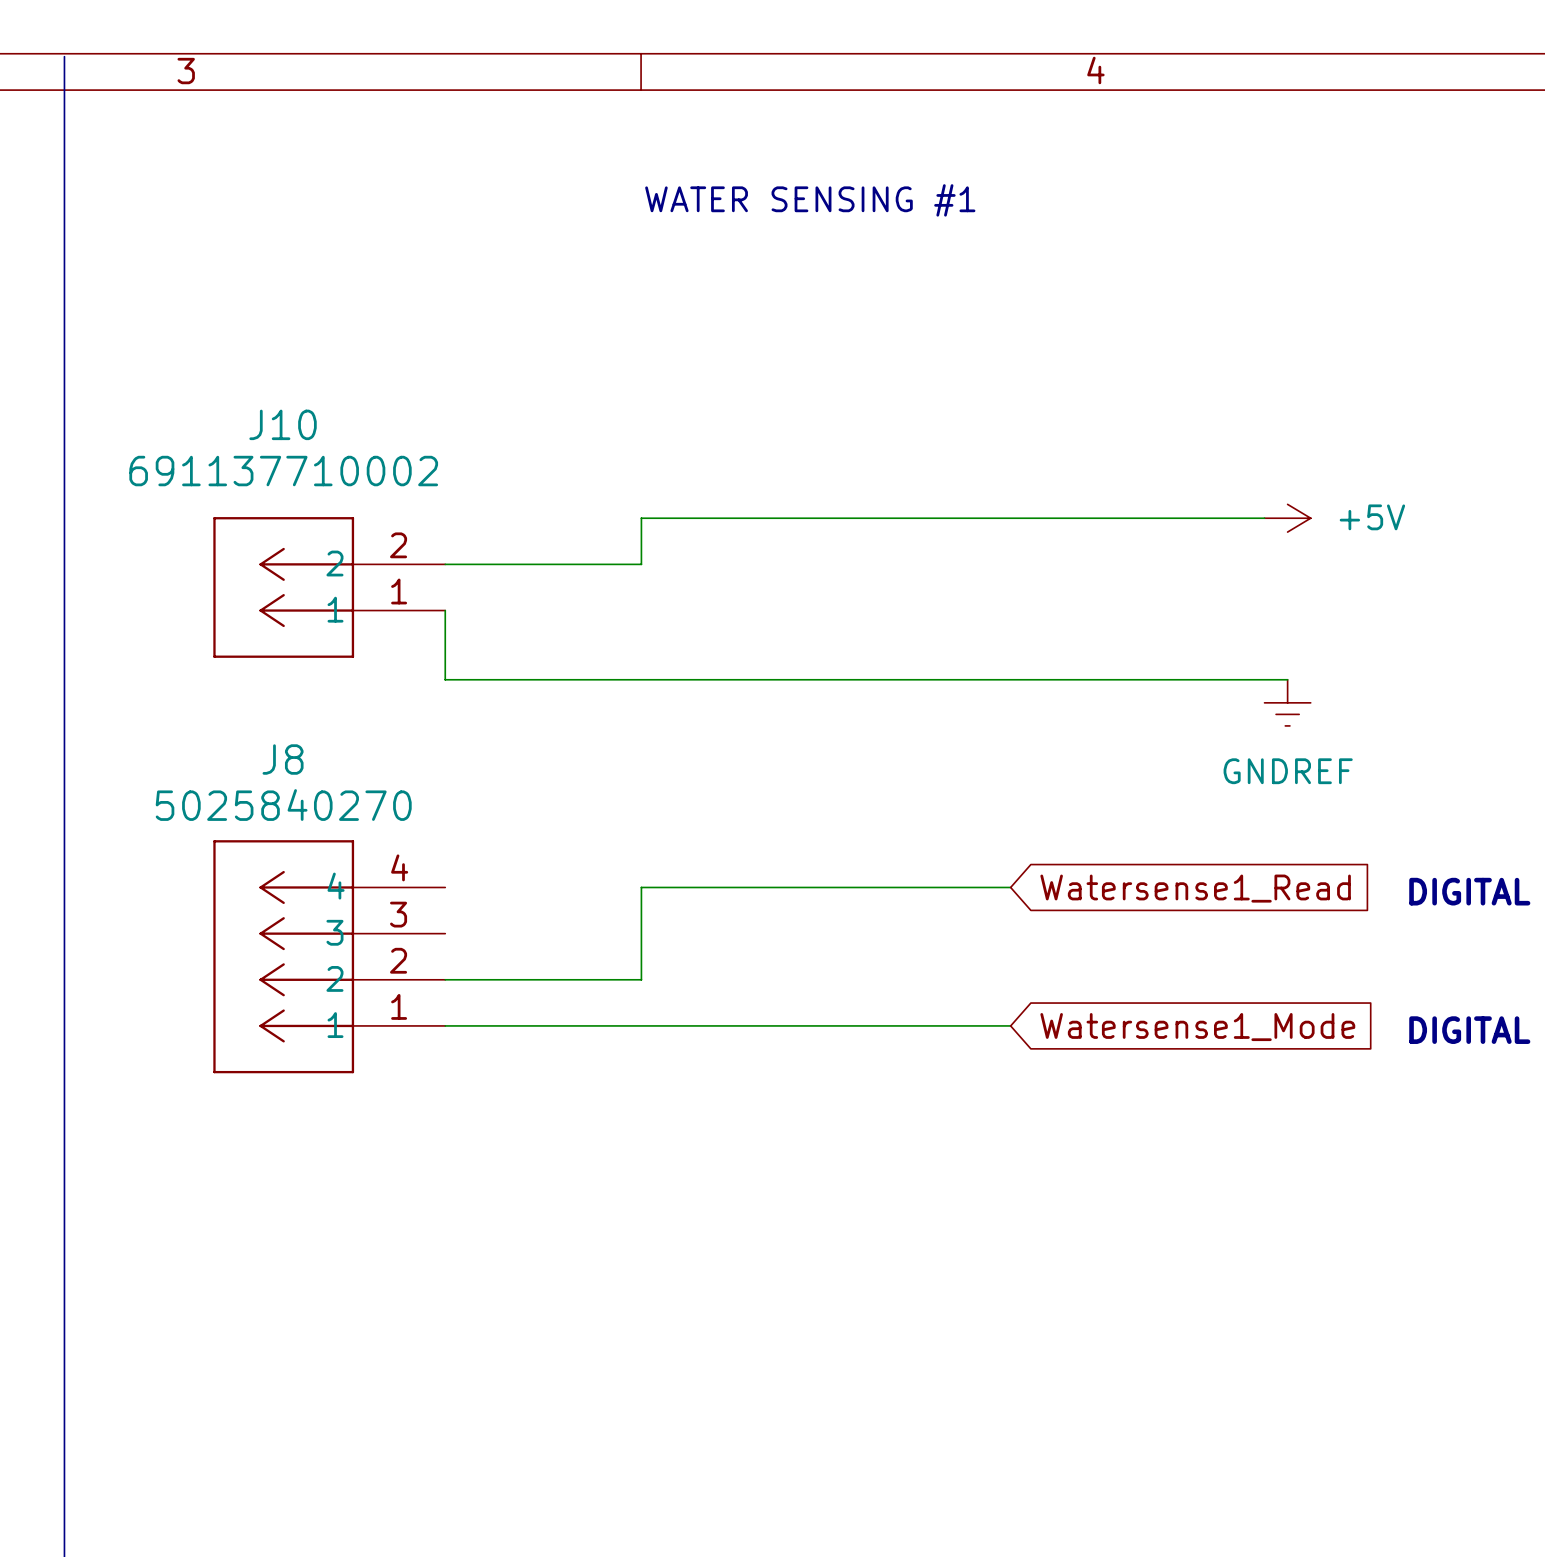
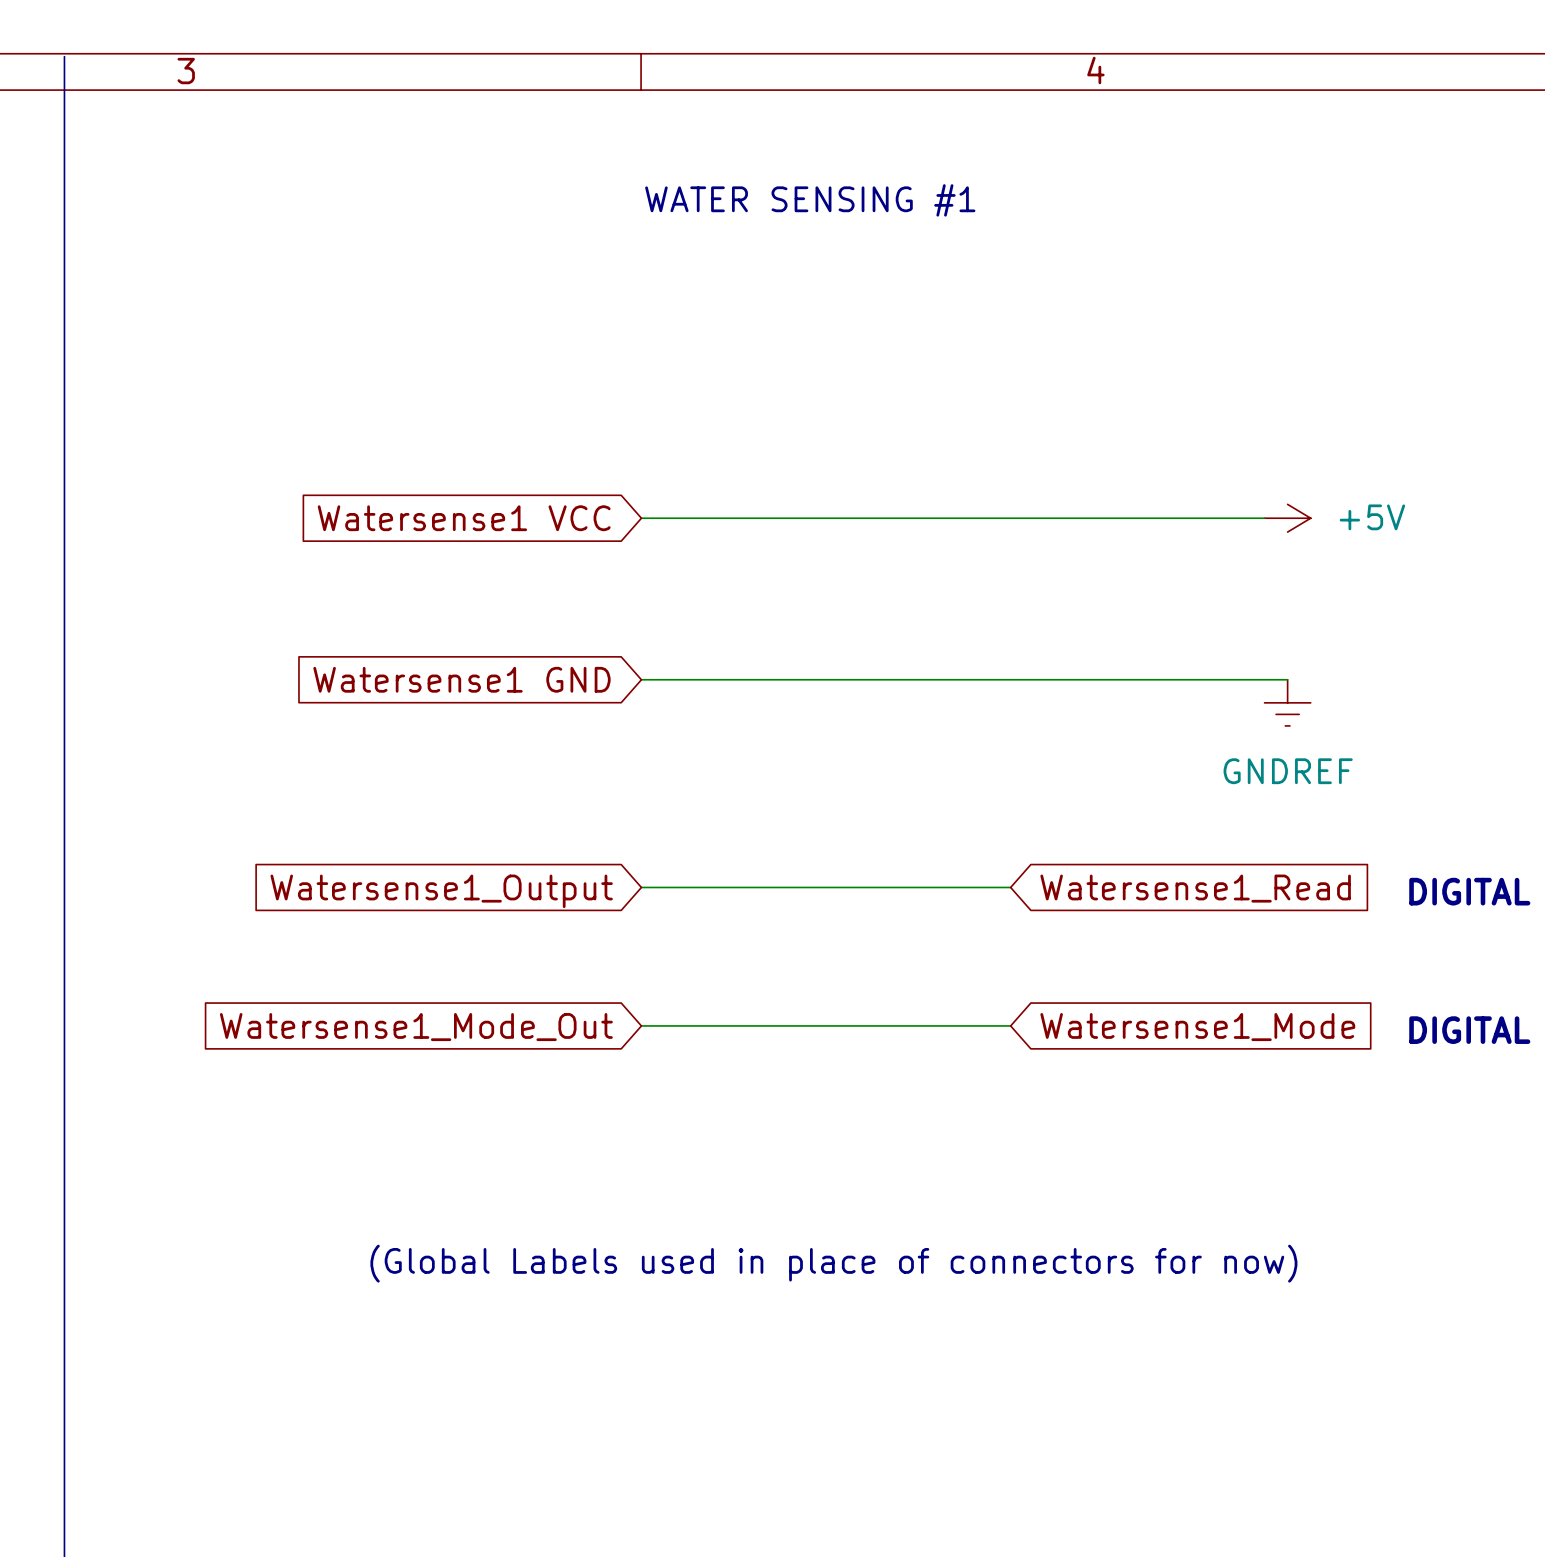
global label: none -> Watersense1 VCC (464, 518)
wire: (641, 518) (641, 564) (445, 564) -> none
J10: 691137710002 (329, 587) -> none
wire: (445, 610) (445, 679) (641, 679) -> none
global label: none -> Watersense1 GND (461, 679)
wire: (641, 887) (641, 979) (445, 979) -> none
global label: none -> Watersense1_Output (441, 891)
J8: 5025840270 (329, 956) -> none
wire: (445, 1025) (641, 1025) -> none
global label: none -> Watersense1_Mode_Out (416, 1027)
text: none -> (Global Labels used in place of connectors for now) (833, 1263)

